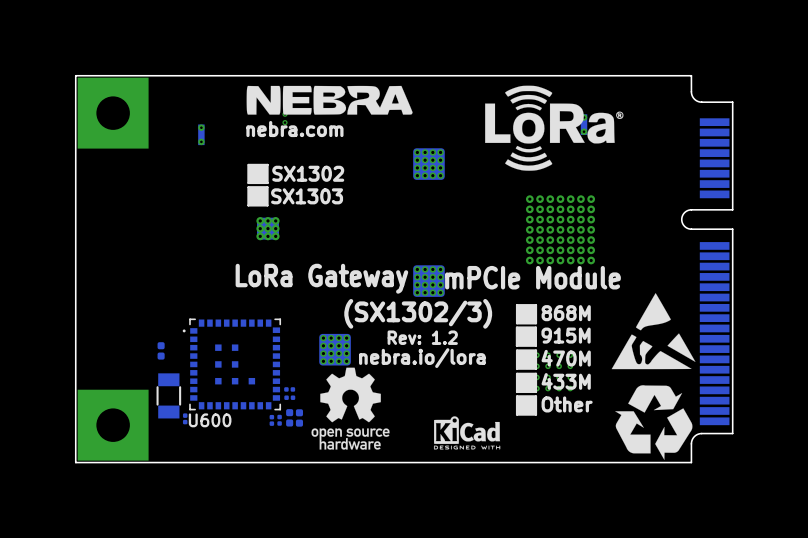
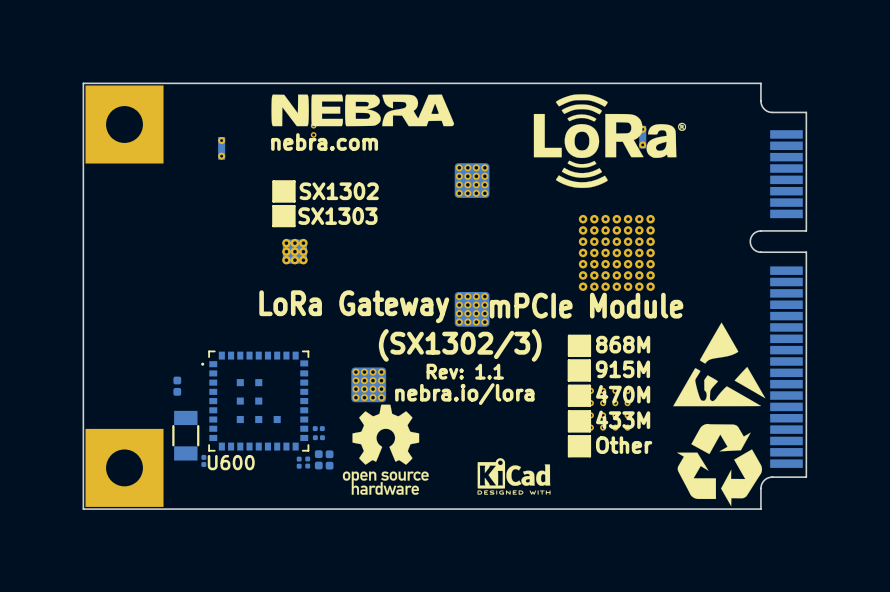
text: Rev: 1.2 (422, 337) -> Rev: 1.1 (465, 371)

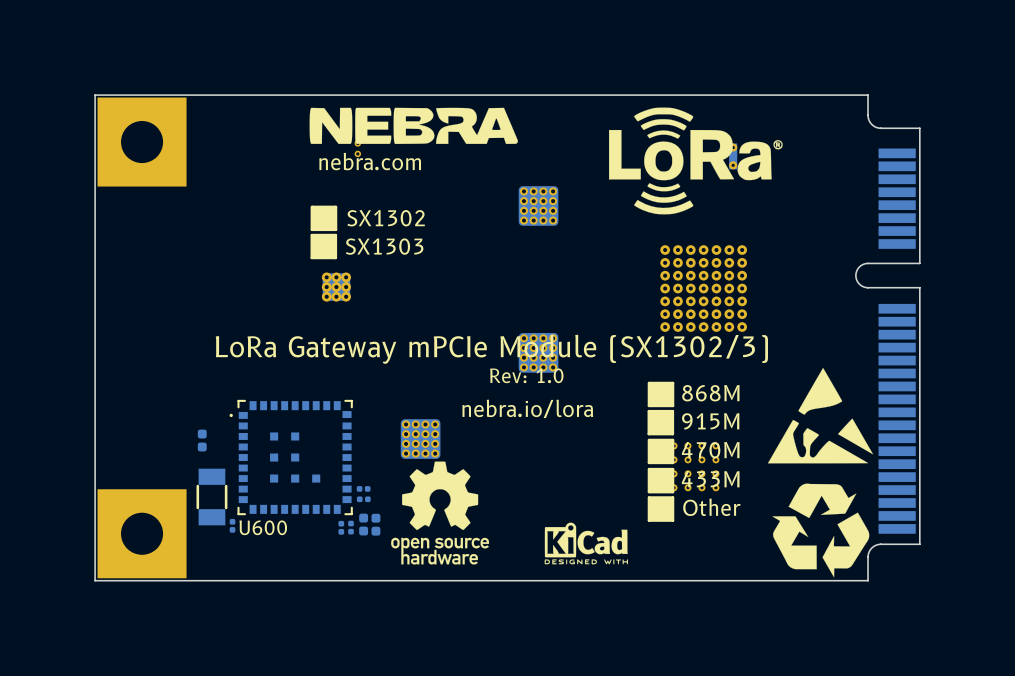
part: (221, 148) -> none
text: mPCIe Module (586, 305) -> none
text: LoRa Gateway (354, 306) -> none
text: none -> LoRa Gateway mPCIe Module (SX1302/3) (491, 349)
text: none -> Rev: 1.0 (526, 375)
text: (SX1302/3) (460, 345) -> none
text: Rev: 1.1 (465, 371) -> none
text position: nebra.io/lora (464, 394) -> nebra.io/lora (527, 408)

